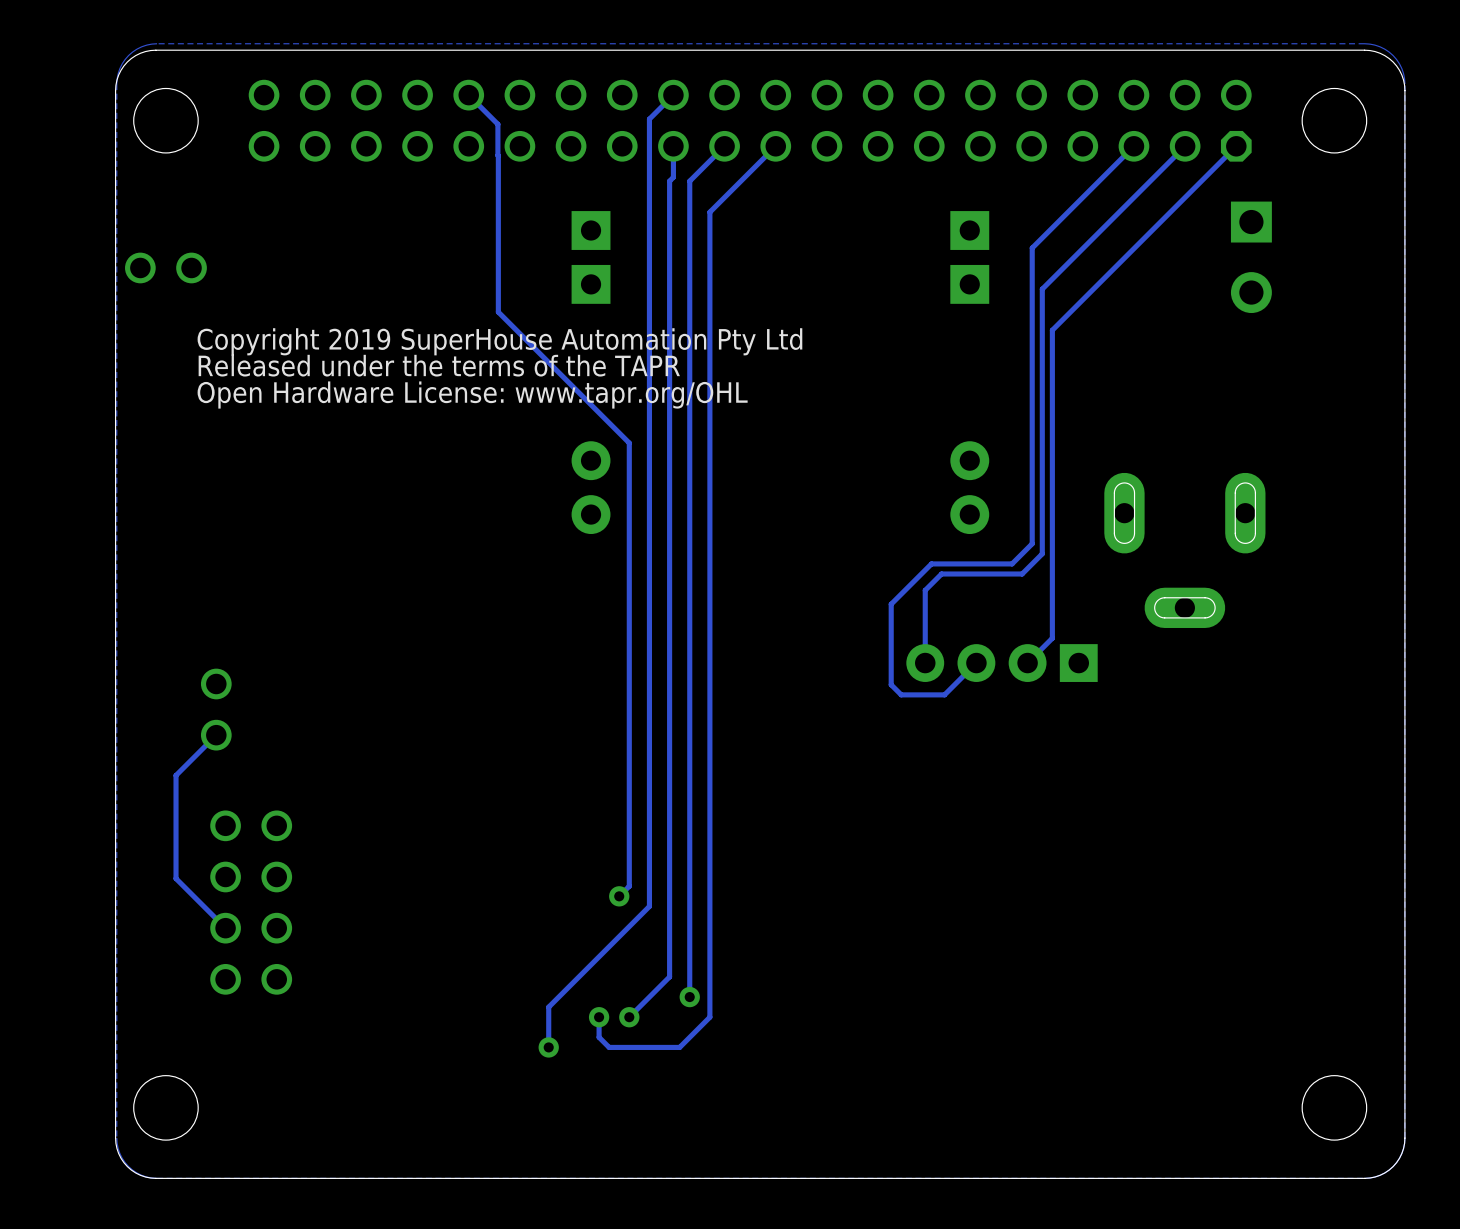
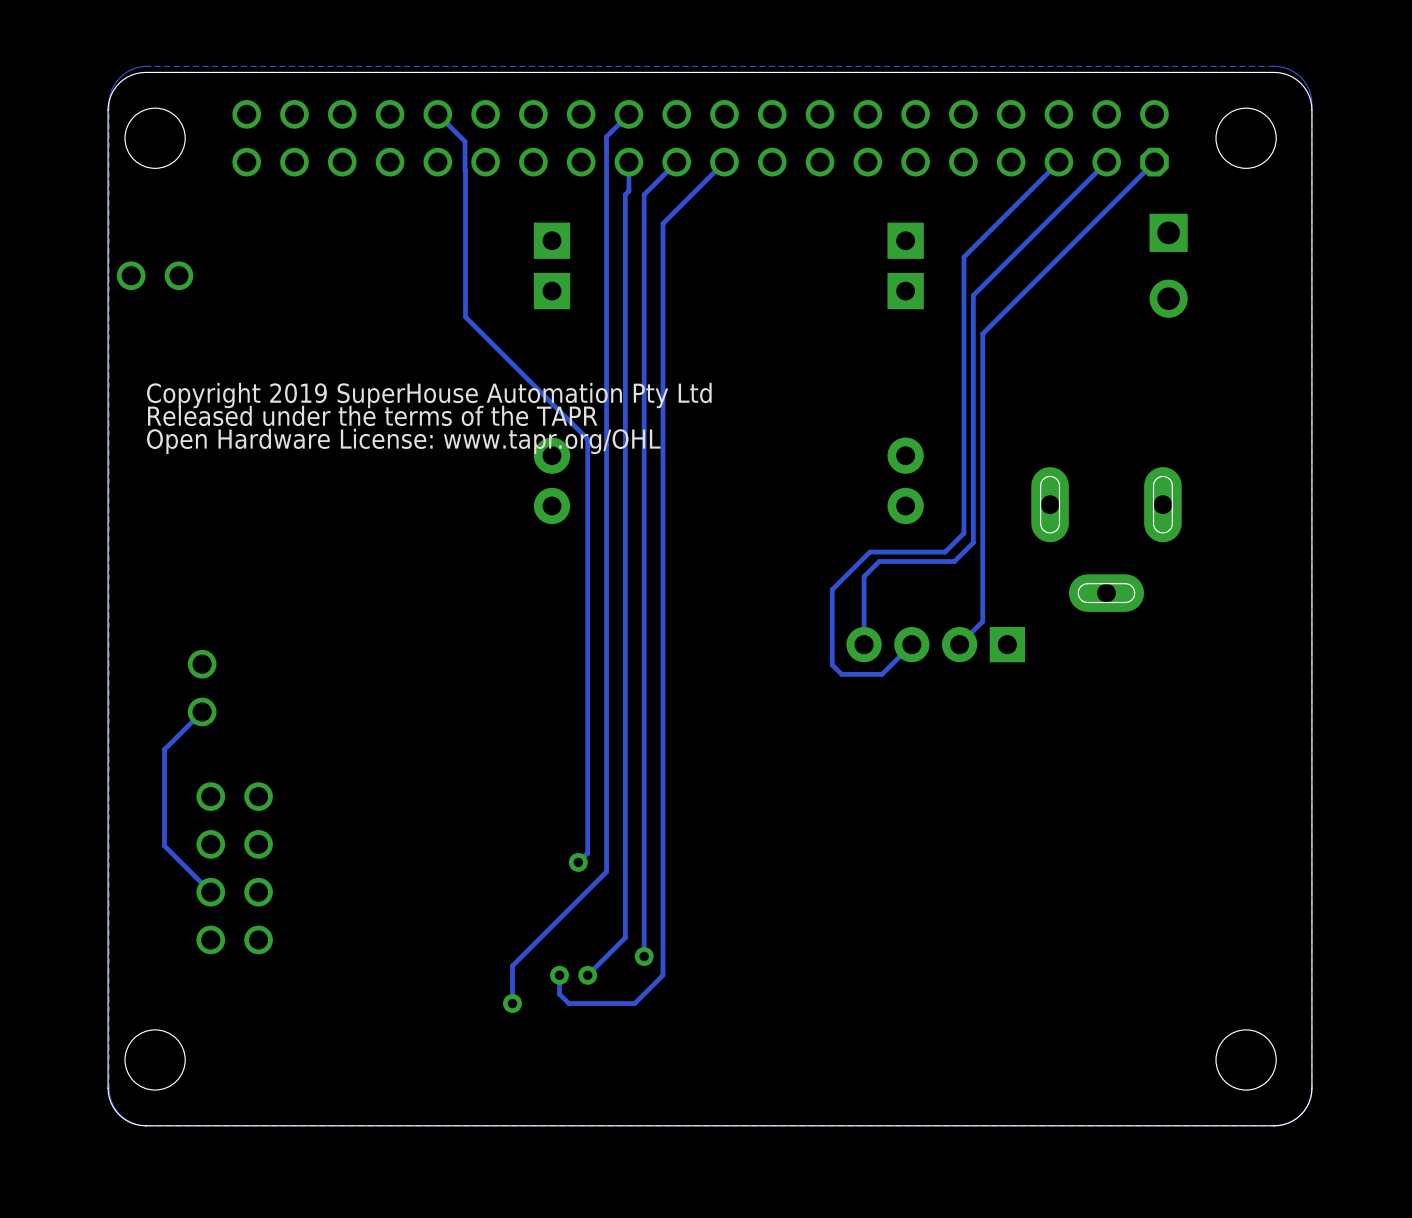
text position: Copyright 2019 SuperHouse Automation Pty Ltd (499, 341) -> Copyright 2019 SuperHouse Automation Pty Ltd (429, 395)
text position: Released under the terms of the TAPR (439, 365) -> Released under the terms of the TAPR (372, 415)
text position: Open Hardware License: www.tapr.org/OHL (472, 395) -> Open Hardware License: www.tapr.org/OHL (403, 441)

